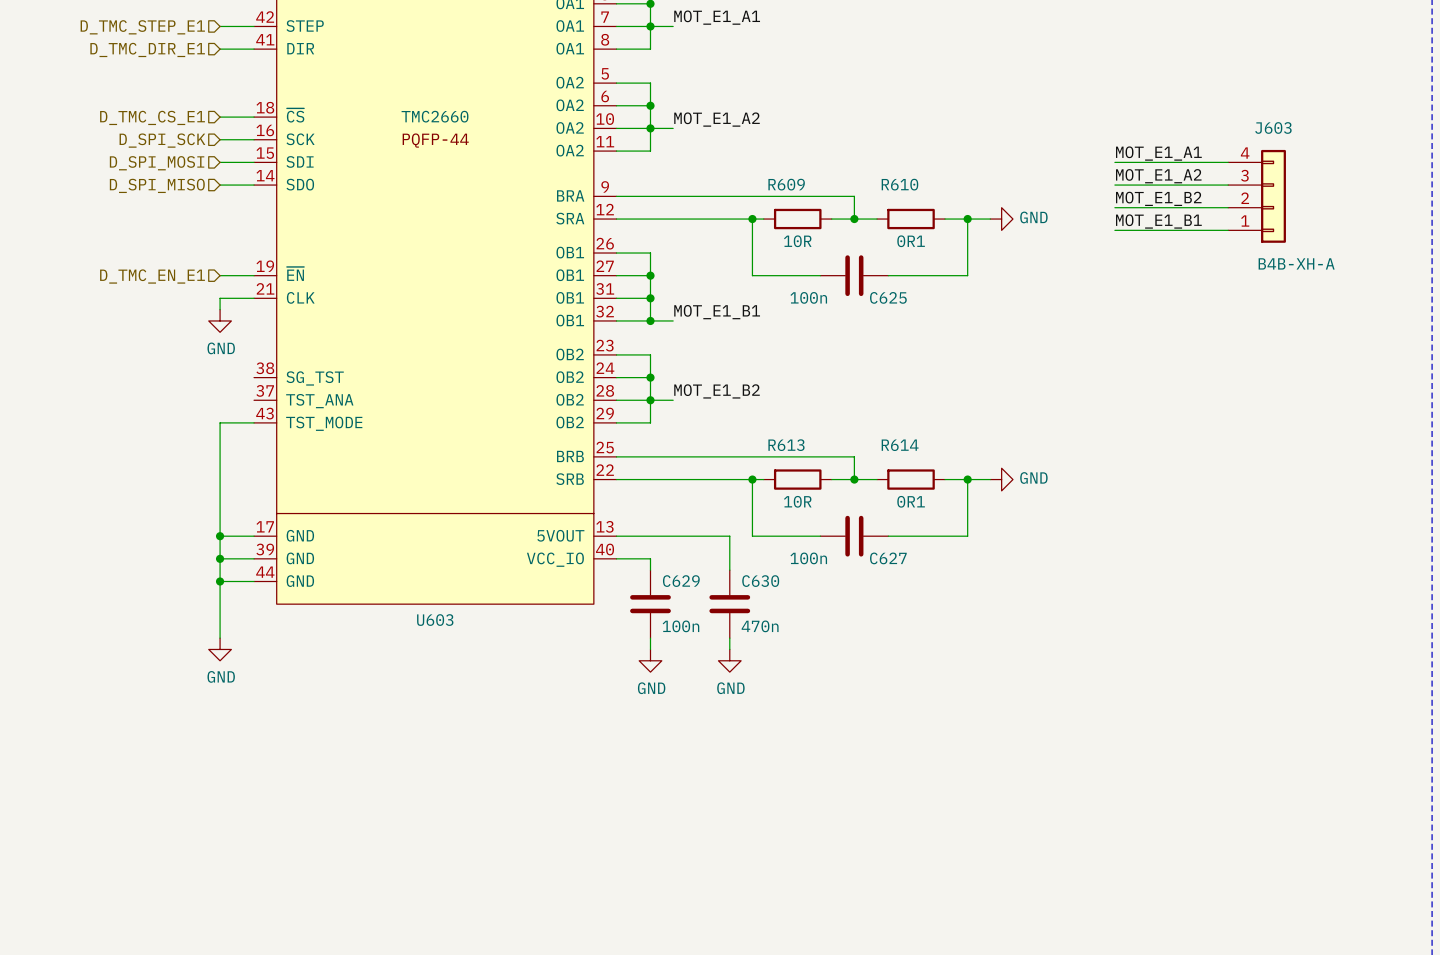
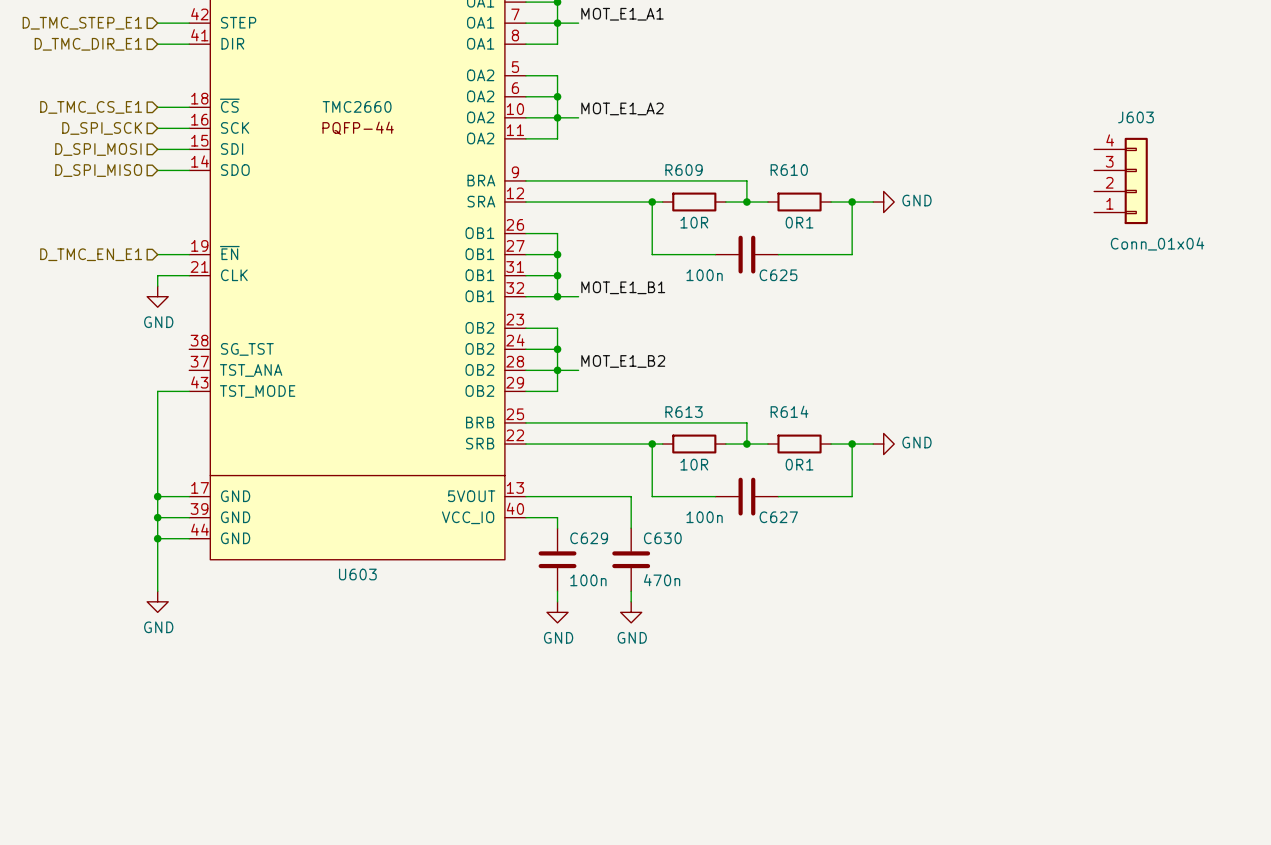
label: MOT_E1_A1 (1158, 153) -> none
wire: (1114, 162) (1228, 162) -> none
label: MOT_E1_A2 (1158, 176) -> none
wire: (1114, 185) (1228, 185) -> none
label: MOT_E1_B2 (1158, 198) -> none
wire: (1114, 207) (1228, 207) -> none
label: MOT_E1_B1 (1158, 221) -> none
wire: (1114, 230) (1228, 230) -> none
J603 value: B4B-XH-A (1296, 263) -> Conn_01x04 (1157, 243)

